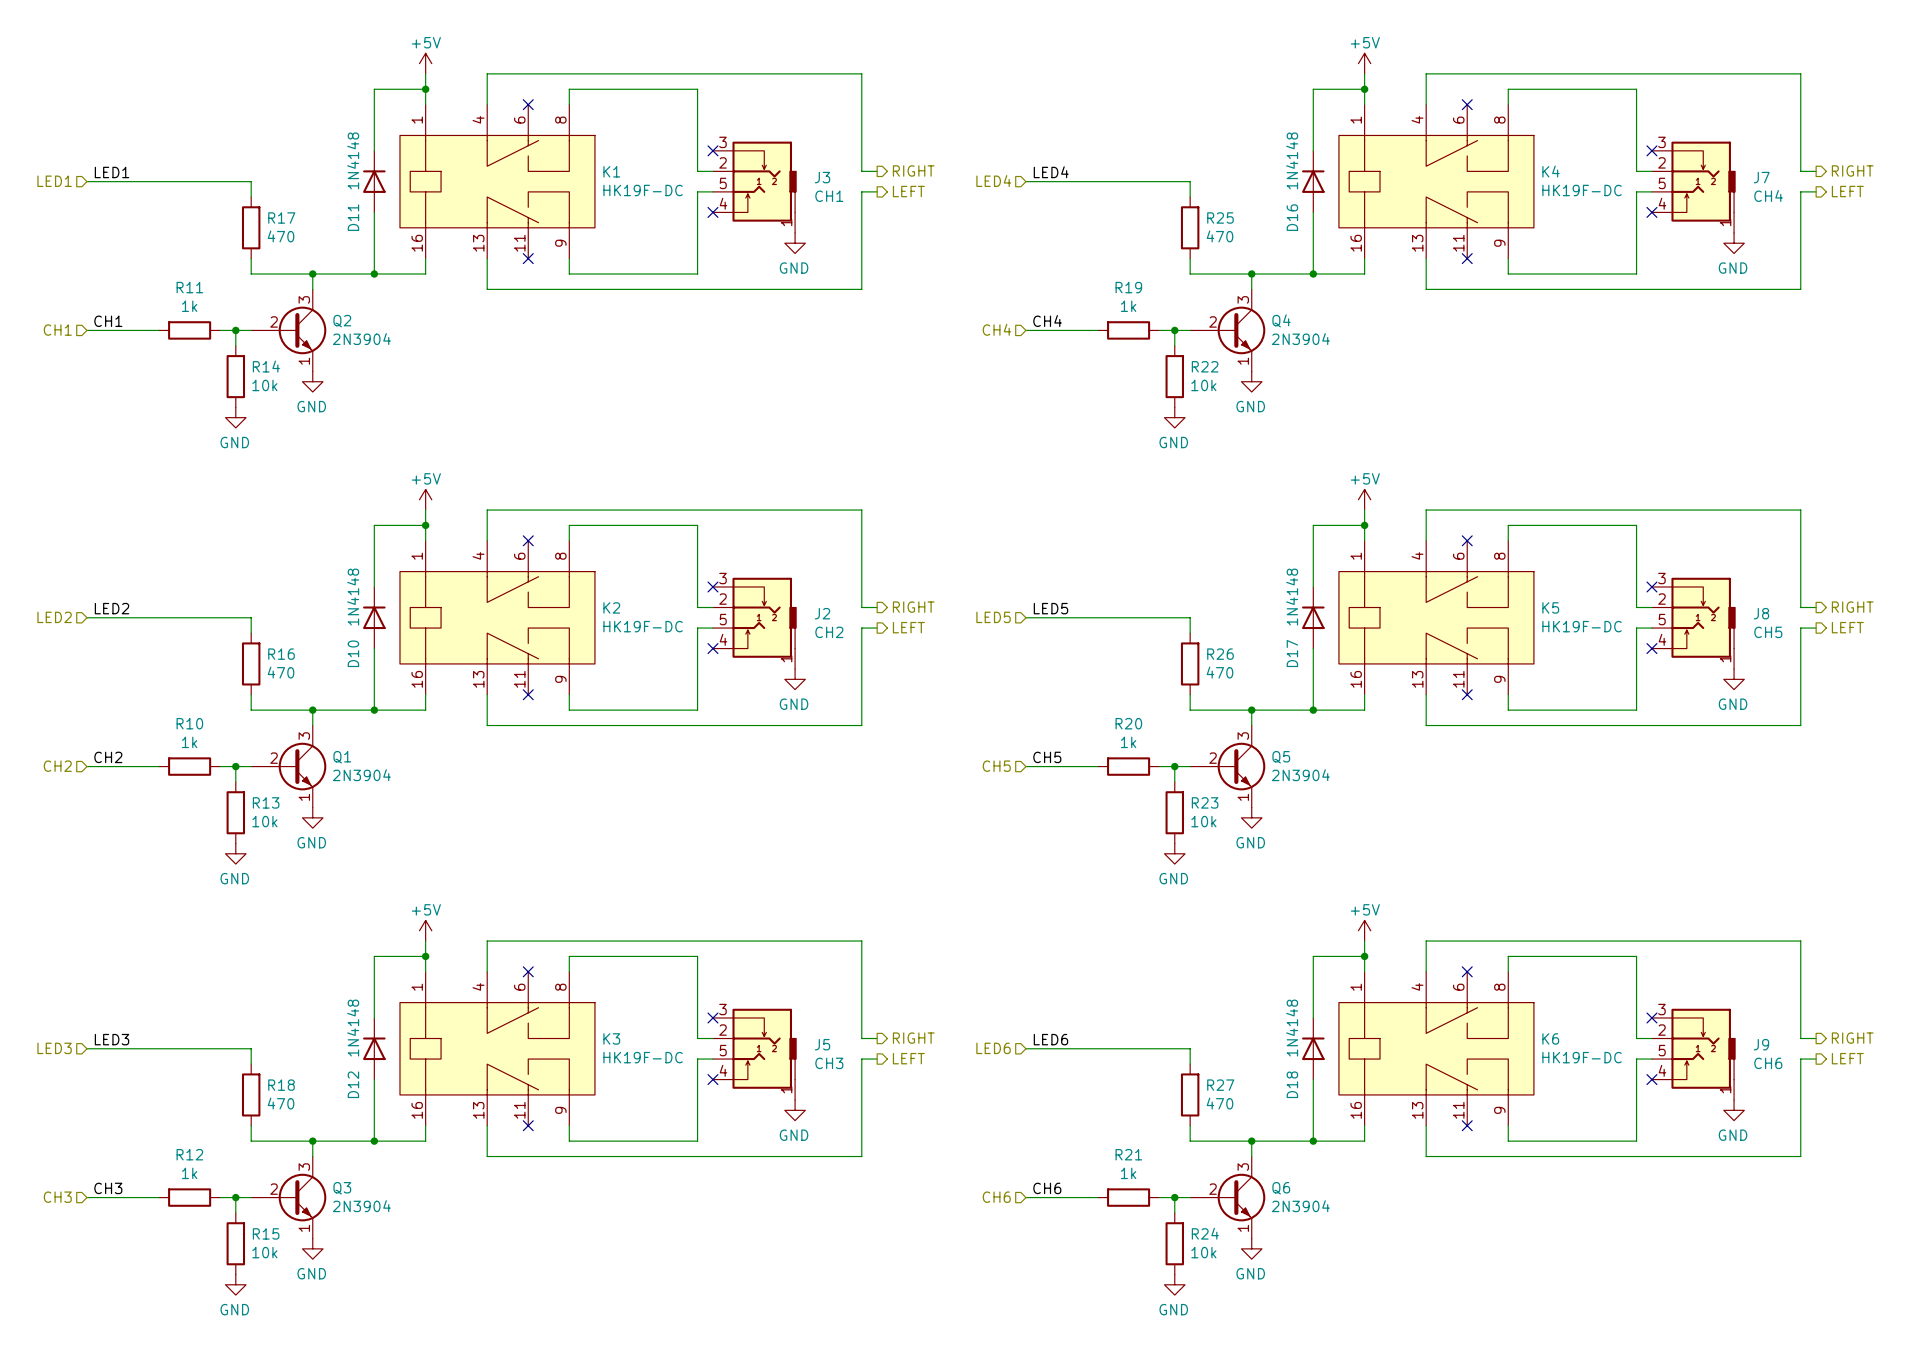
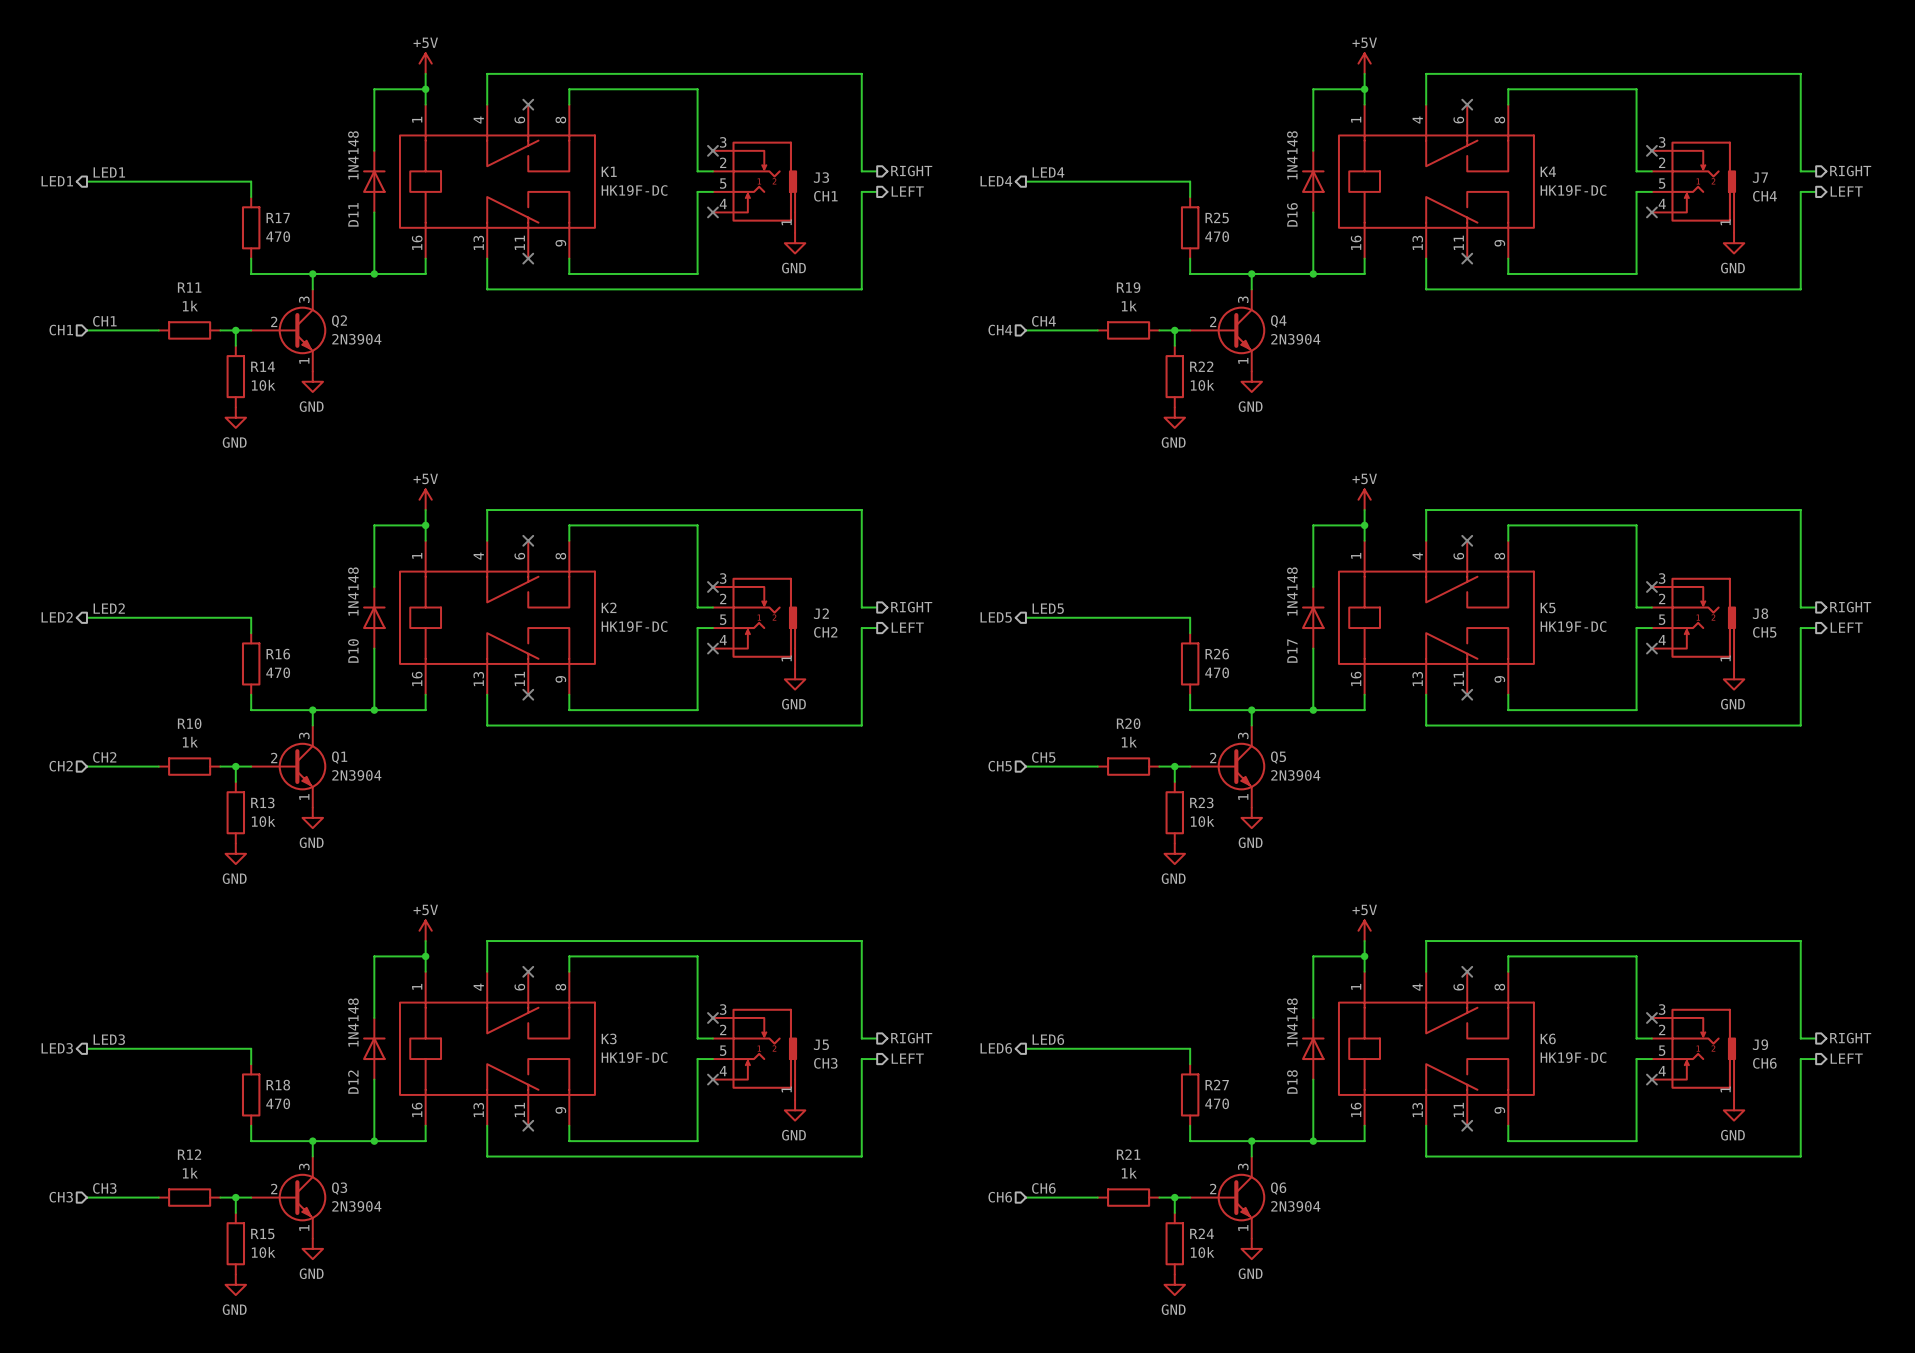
hierarchical label shape: input (54, 181) -> output (57, 181)
hierarchical label shape: input (993, 181) -> output (996, 181)
hierarchical label shape: input (54, 617) -> output (57, 617)
hierarchical label shape: input (993, 617) -> output (996, 617)
hierarchical label shape: input (54, 1048) -> output (57, 1048)
hierarchical label shape: input (993, 1048) -> output (996, 1048)

